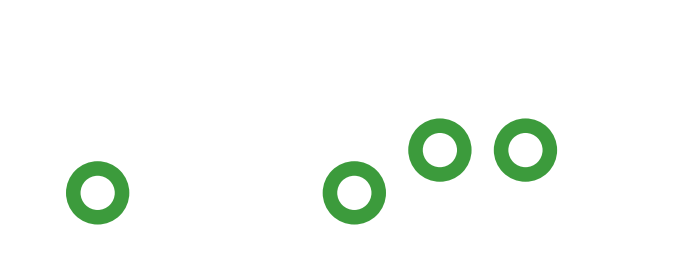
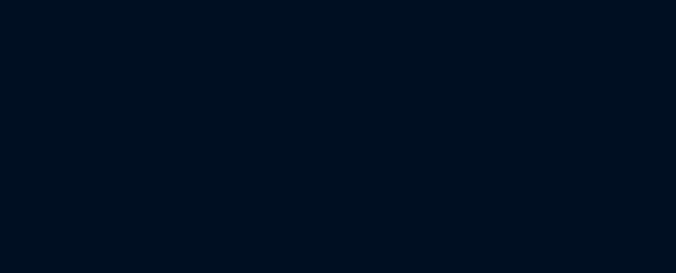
part: (482, 150) -> none
part: (97, 192) -> none
part: (354, 192) -> none

